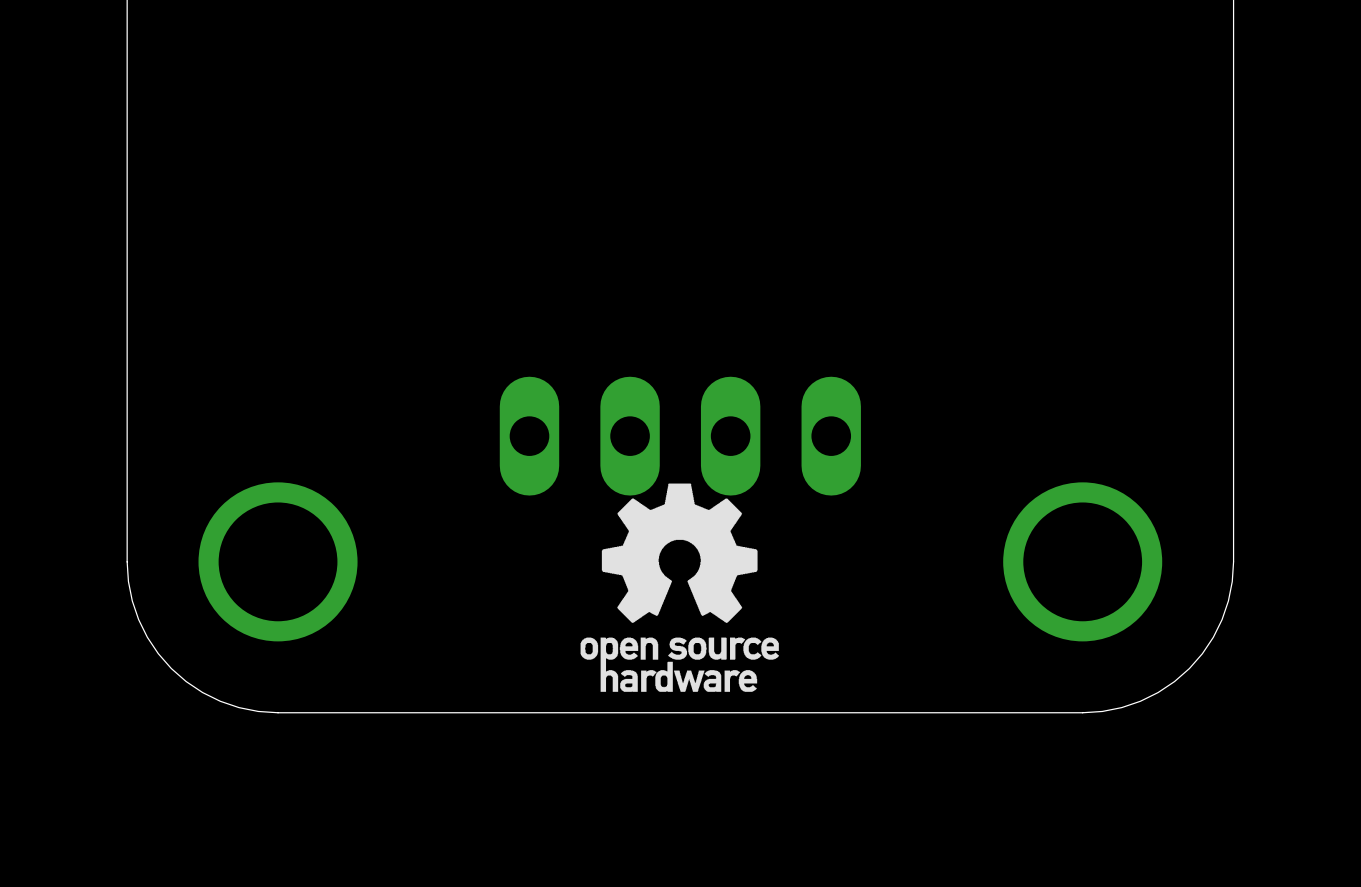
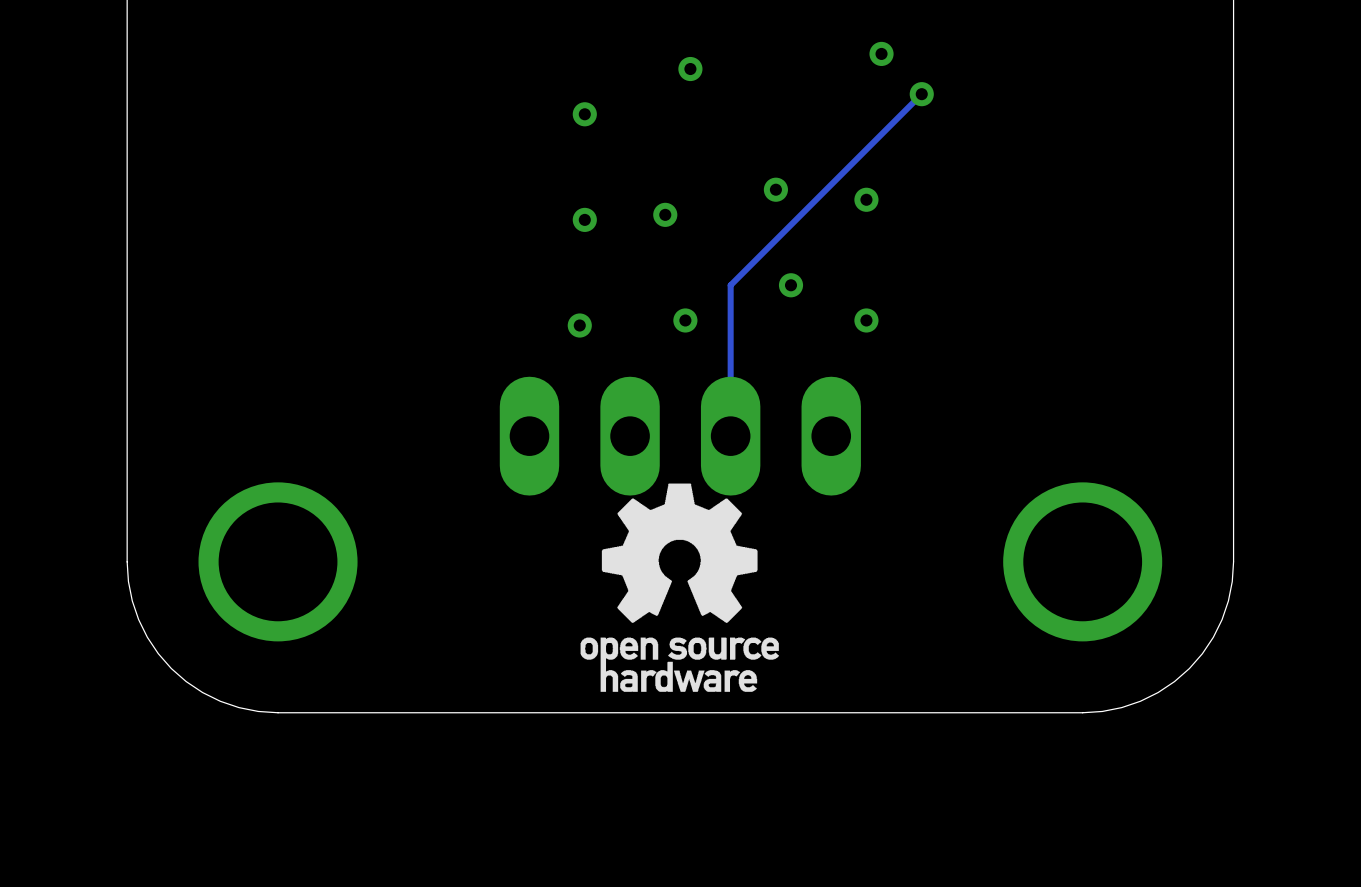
via: none -> (881, 53)
via: none -> (690, 69)
track: none -> (921, 94) (730, 285) (730, 436)
via: none -> (921, 94)
via: none -> (584, 114)
via: none -> (775, 189)
via: none -> (866, 199)
via: none -> (665, 214)
via: none -> (584, 219)
via: none -> (791, 285)
via: none -> (685, 320)
via: none -> (866, 320)
via: none -> (579, 325)

